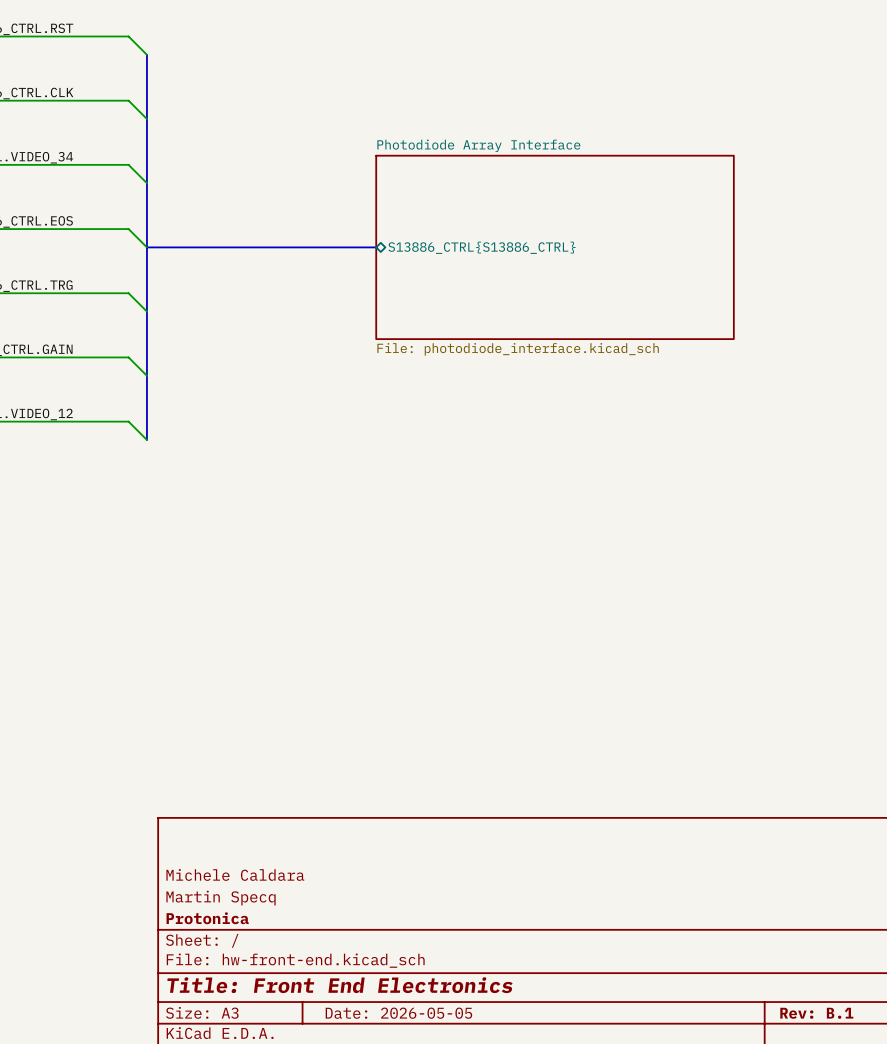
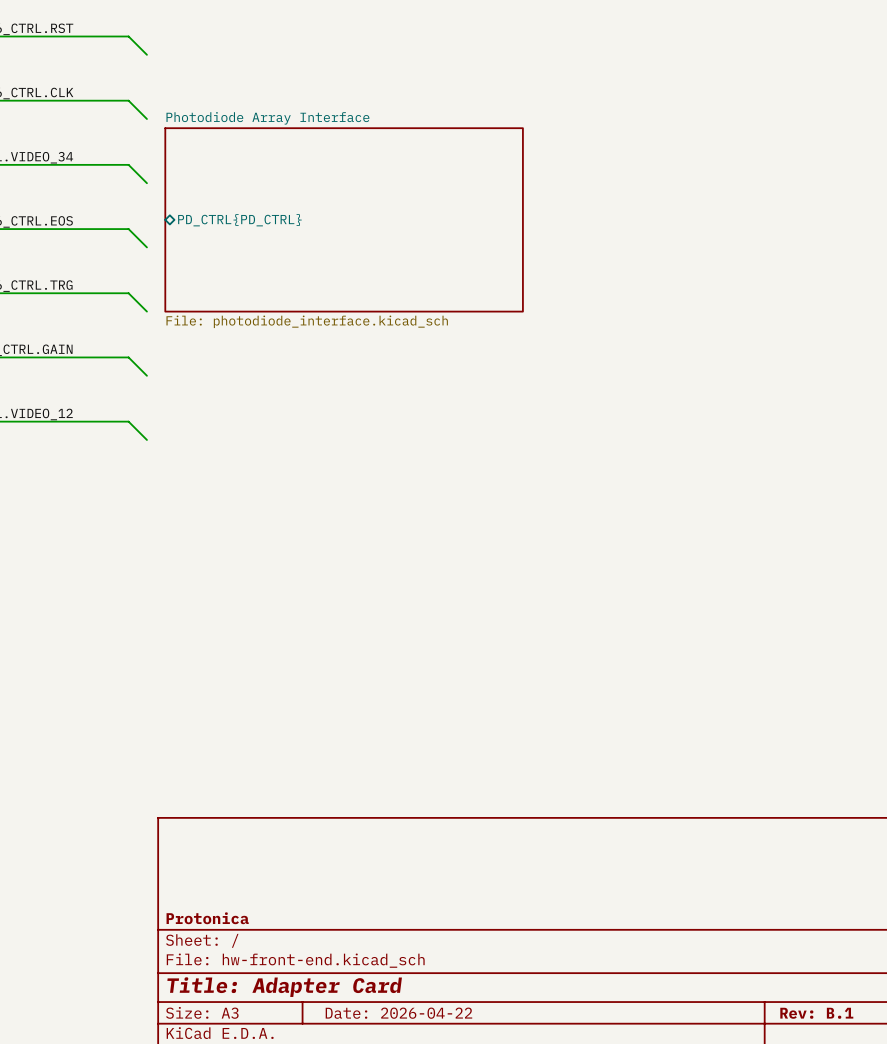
bus: (146, 54) (146, 439) -> none
sheet Photodiode Array Interface: none -> File: photodiode_interface.kicad_sch (344, 219)
sheet pin: none -> PD_CTRL{PD_CTRL} (239, 220)
bus: (146, 247) (376, 247) -> none
sheet pin: S13886_CTRL{S13886_CTRL} (482, 247) -> none
sheet Photodiode Array Interface: File: photodiode_interface.kicad_sch (555, 247) -> none
title block: Michele Caldara (235, 874) -> none
title block: Martin Specq (221, 898) -> none
title block: Title: Front End Electronics (340, 985) -> Title: Adapter Card (284, 987)
title block: Date: 2026-05-05 (398, 1013) -> Date: 2026-04-22 (398, 1013)

